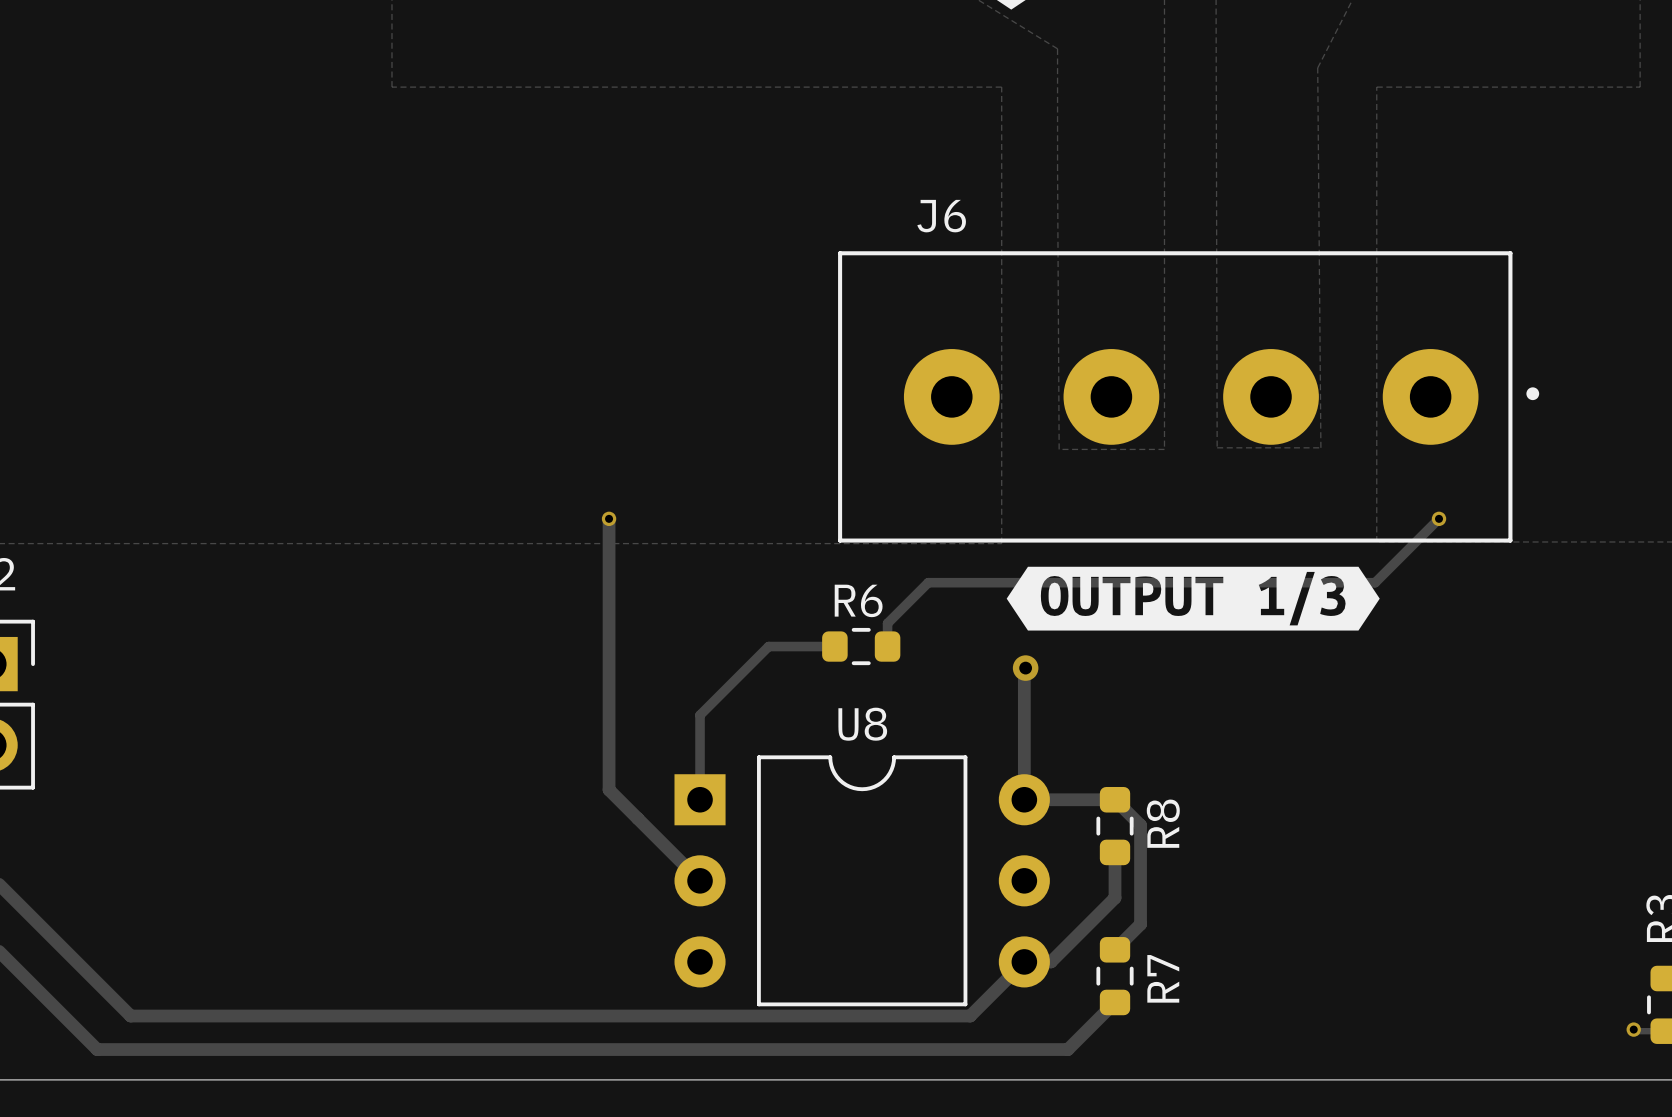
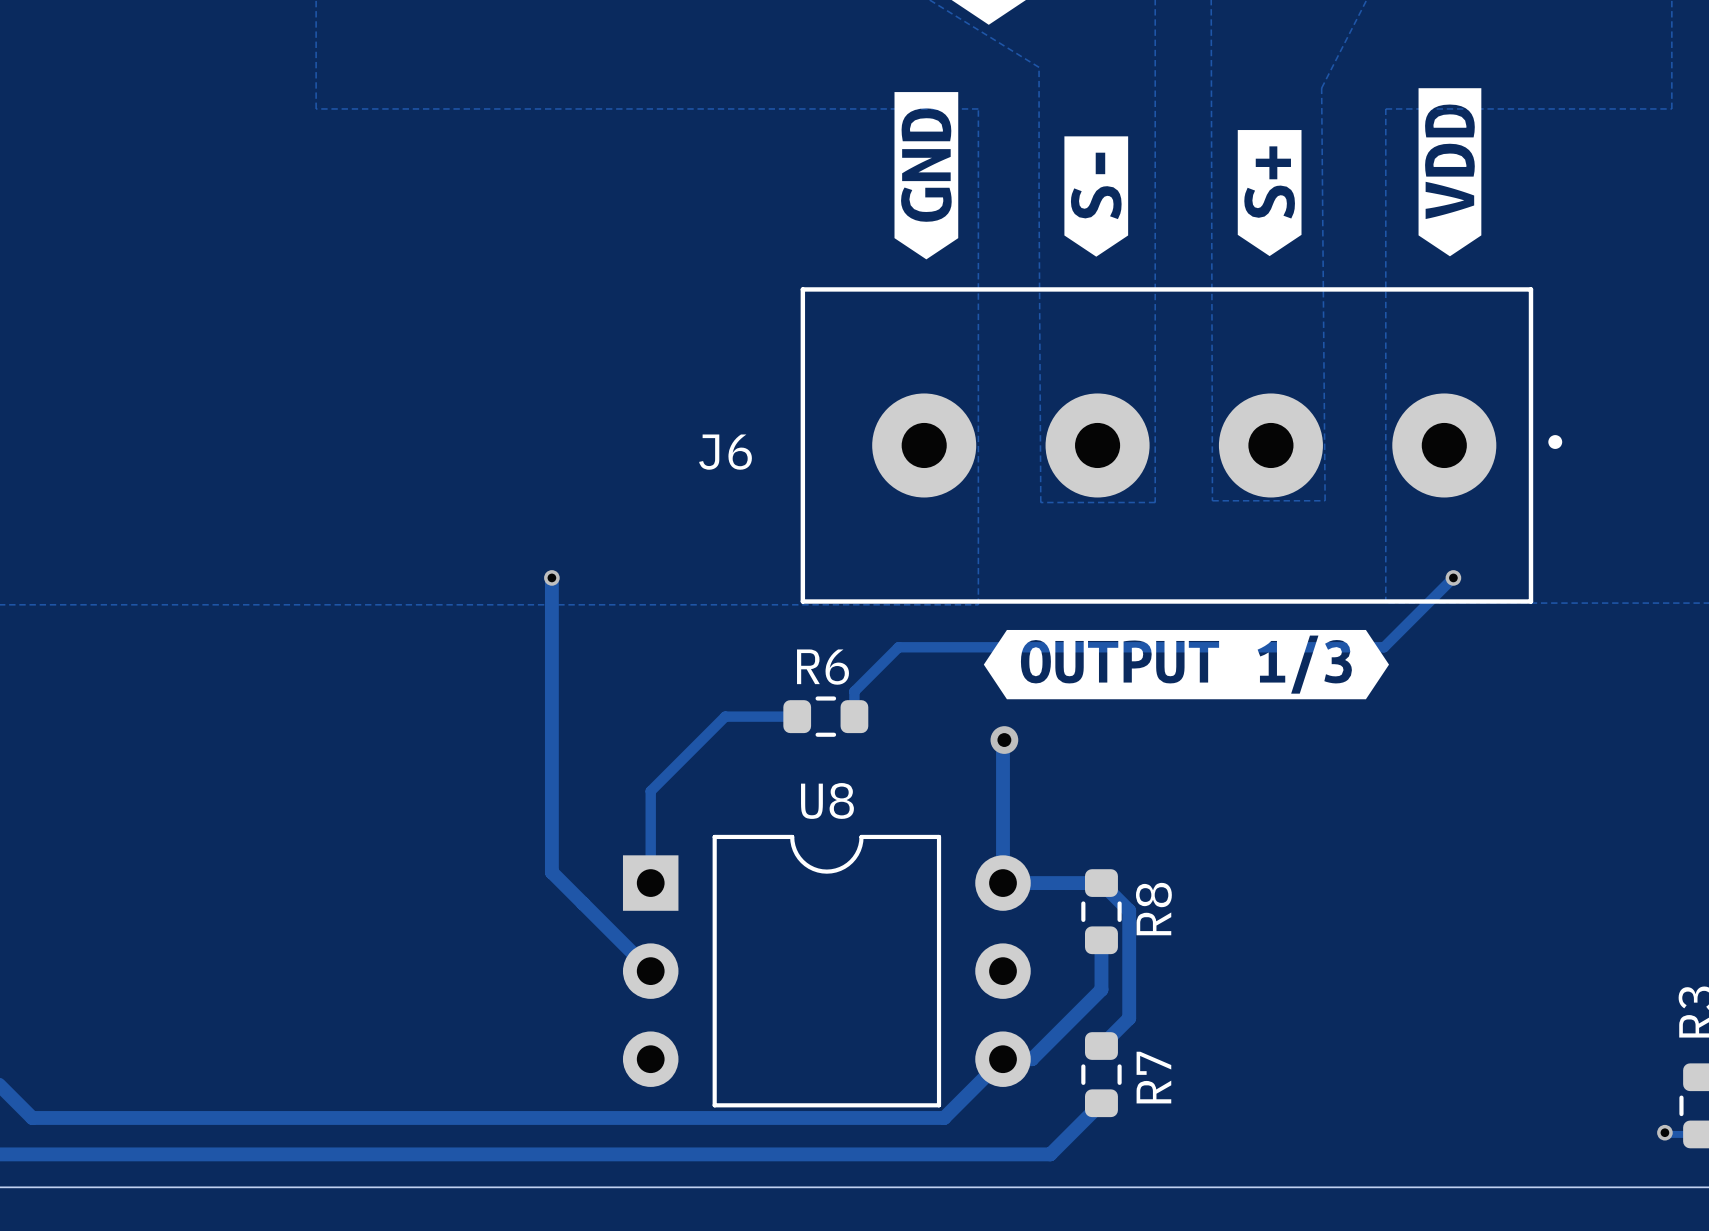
drawing: none -> [1418, 88, 1482, 257]
drawing: none -> [894, 92, 959, 260]
drawing: none -> [1237, 130, 1302, 257]
drawing: none -> [1064, 136, 1129, 257]
J6 name position: J6 (941, 216) -> J6 (725, 452)

